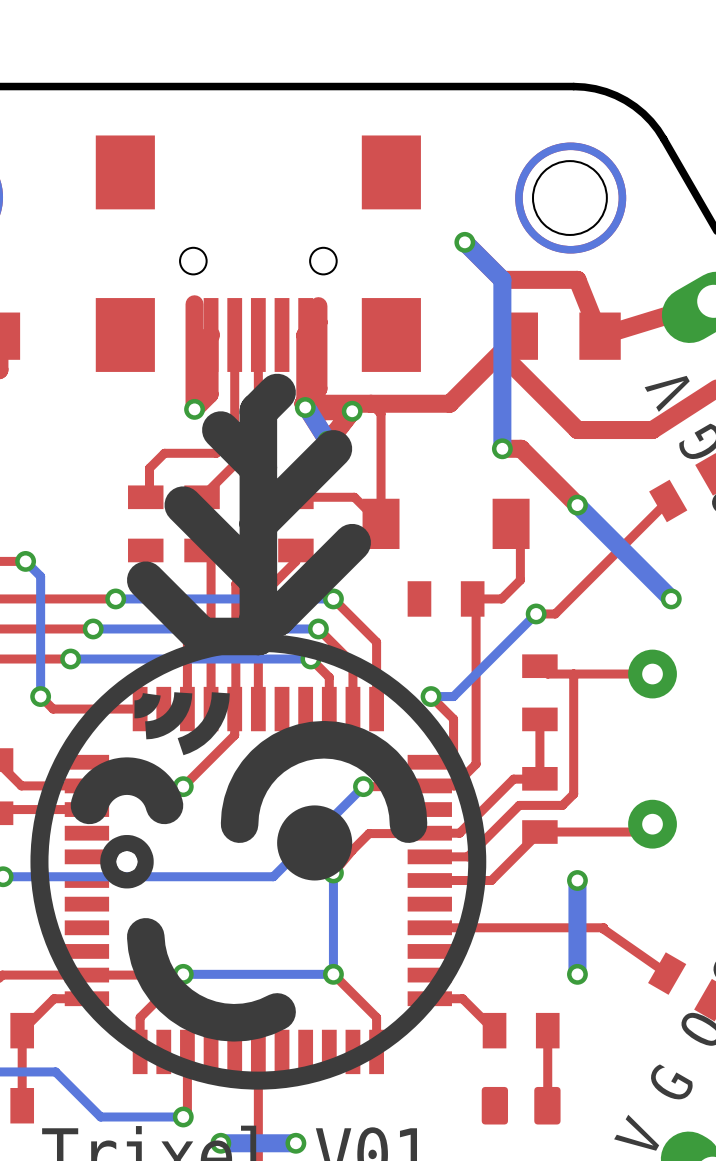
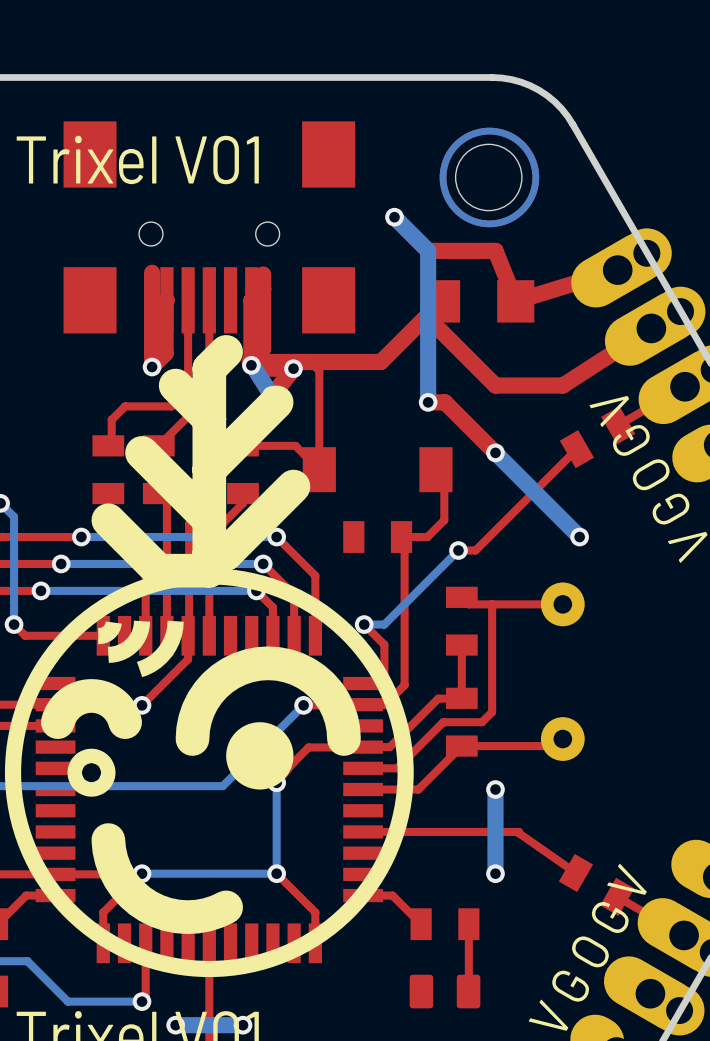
text: none -> Trixel V01 (137, 159)

